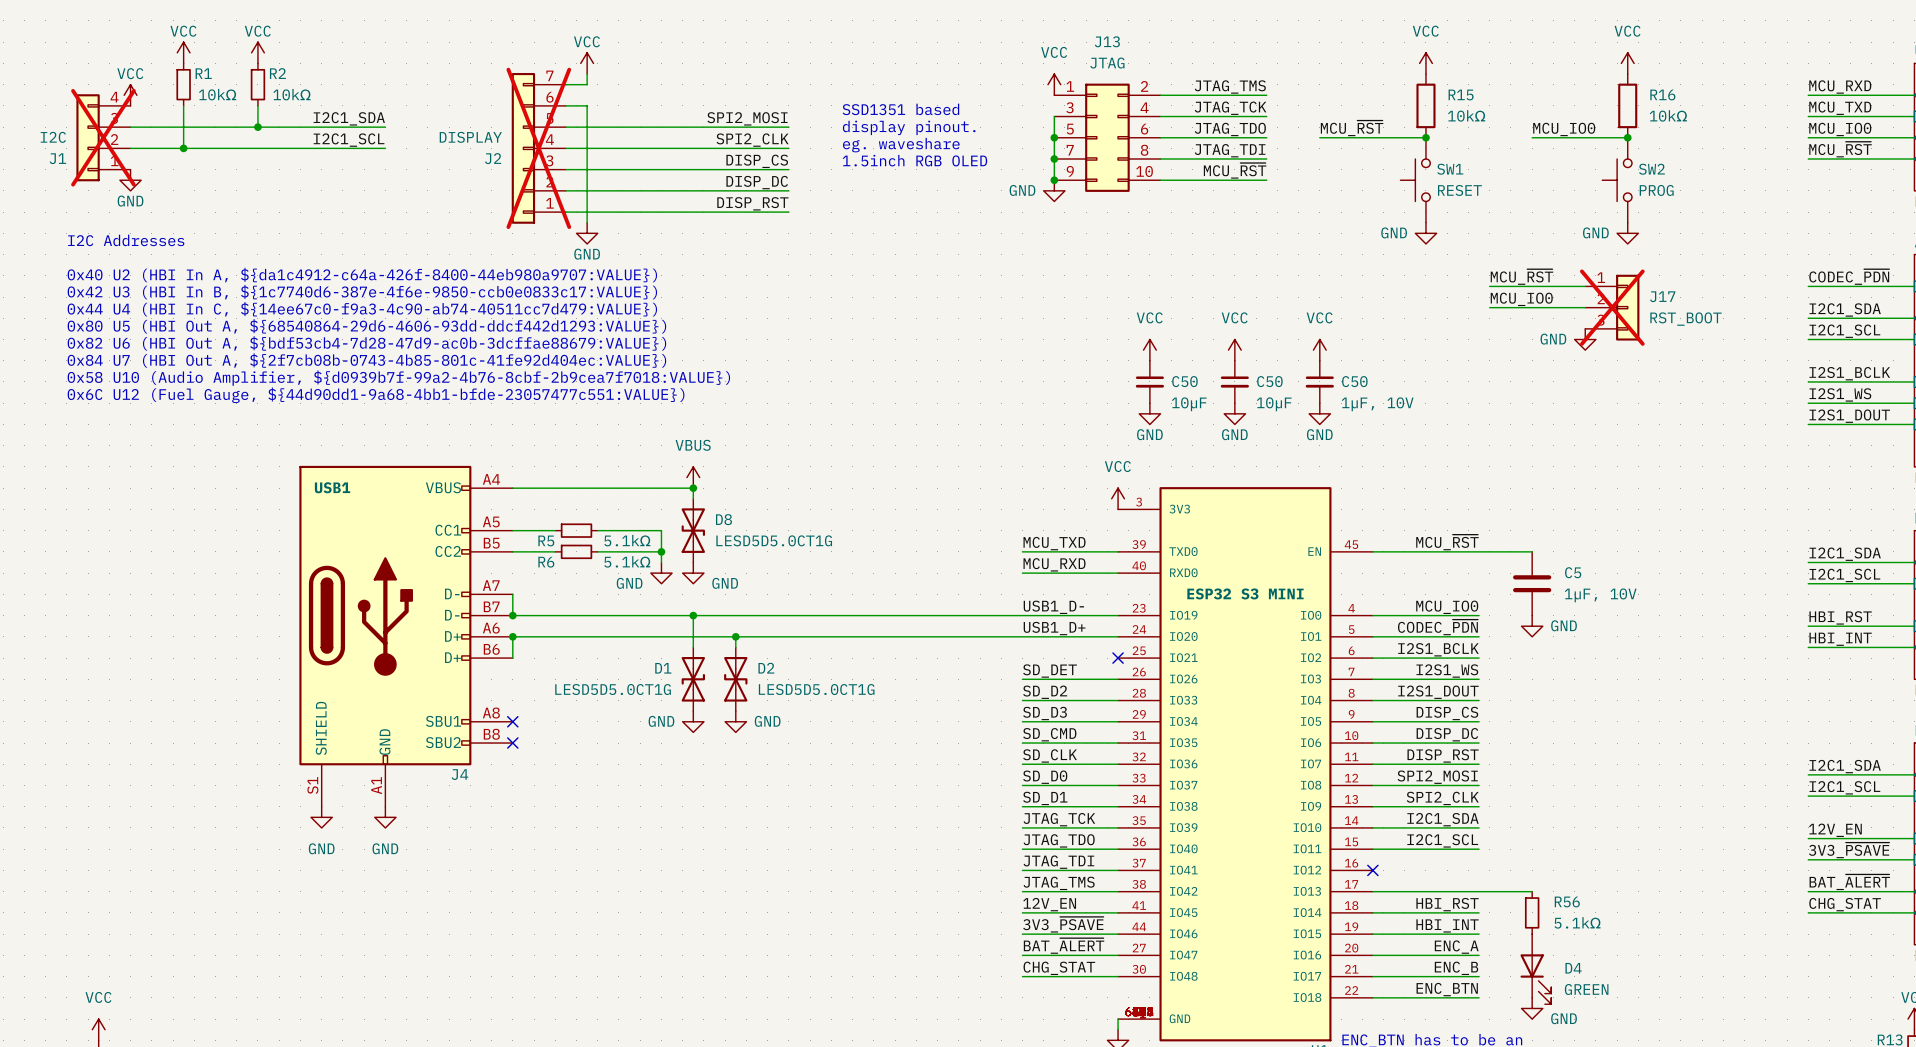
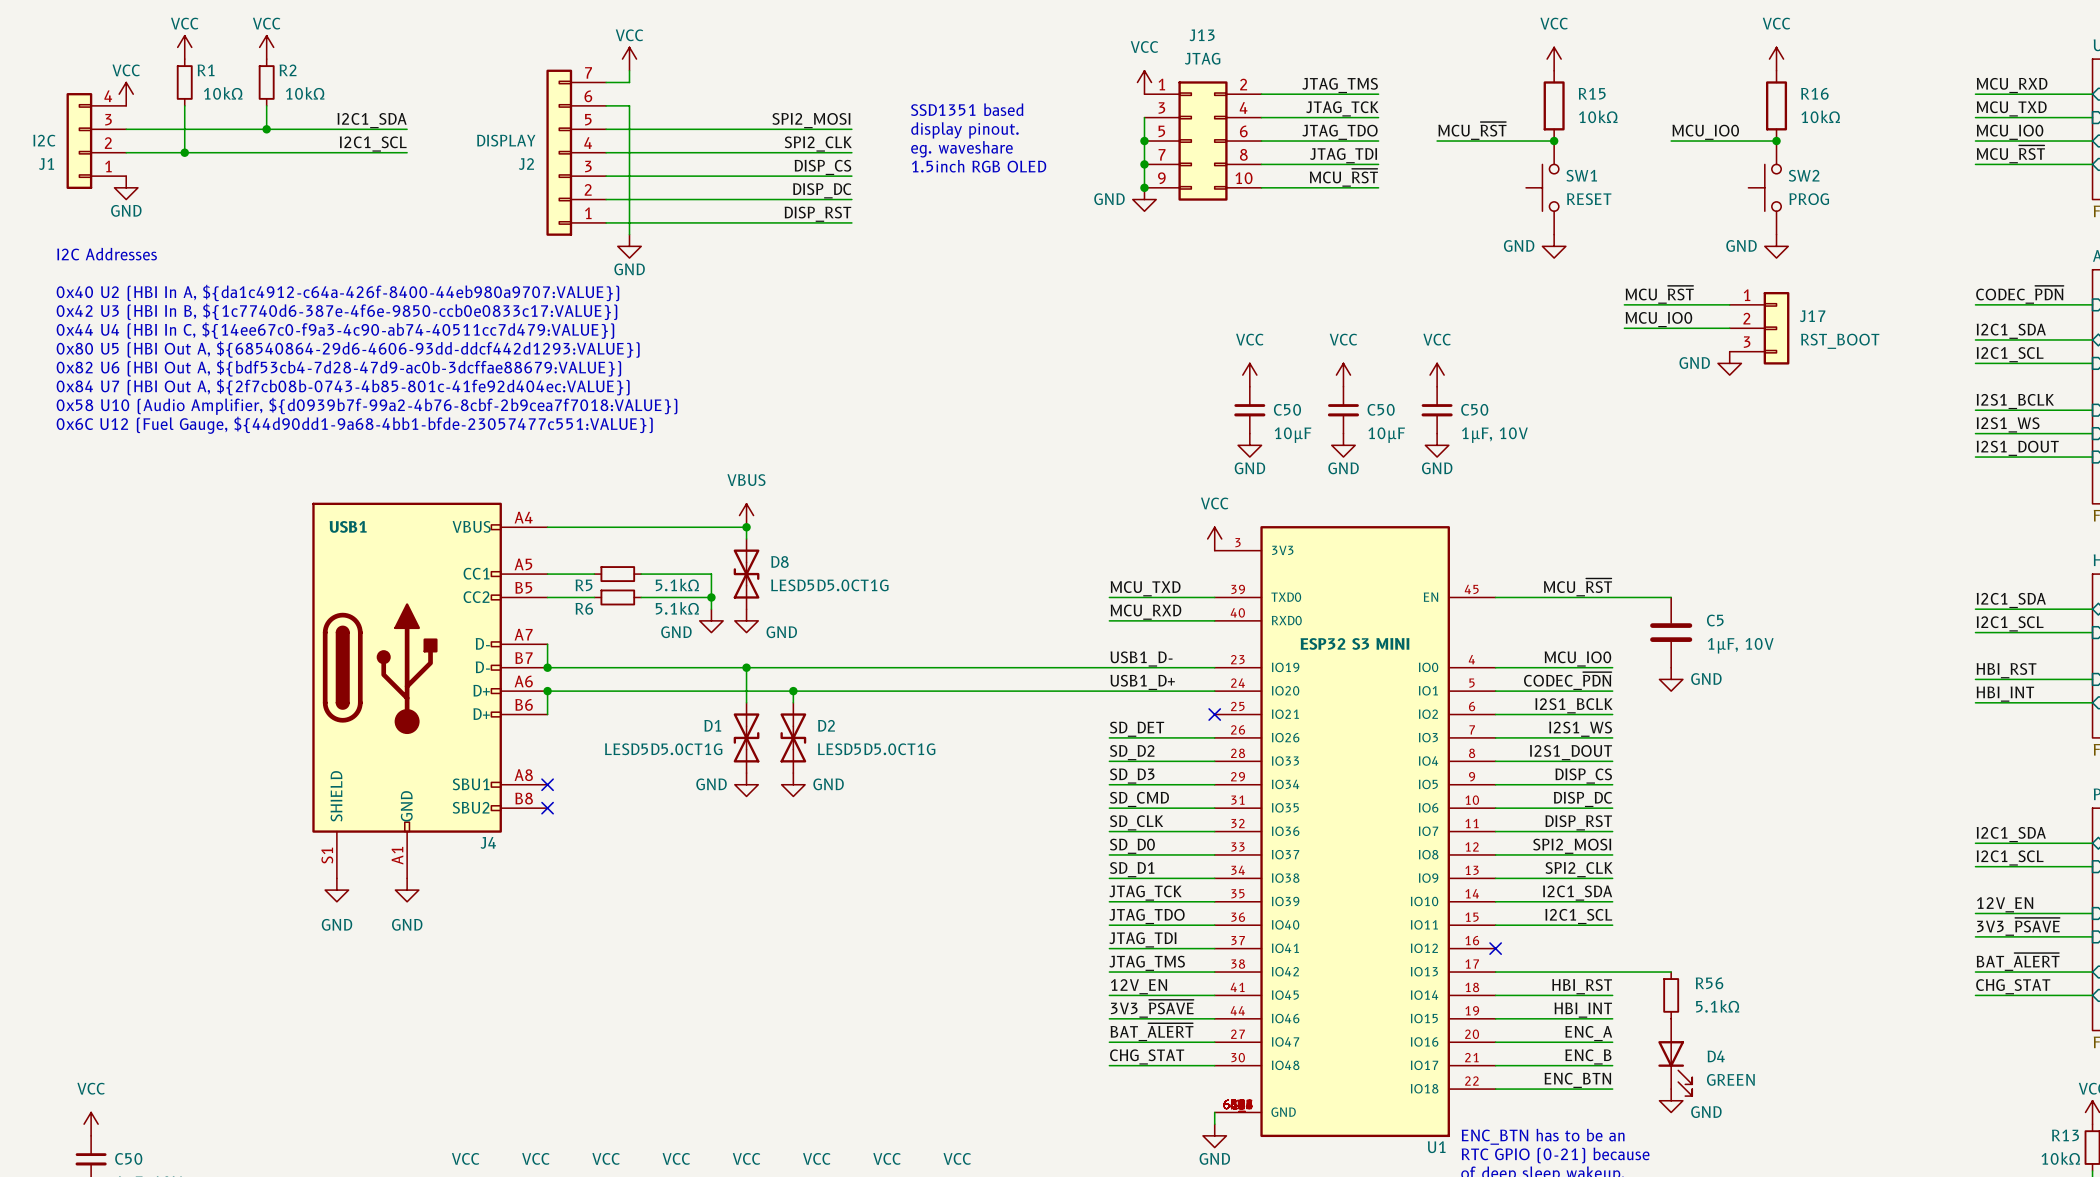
J1 do-not-place cross: (103, 137) -> none
J2 do-not-place cross: (538, 148) -> none
J17 do-not-place cross: (1612, 307) -> none

